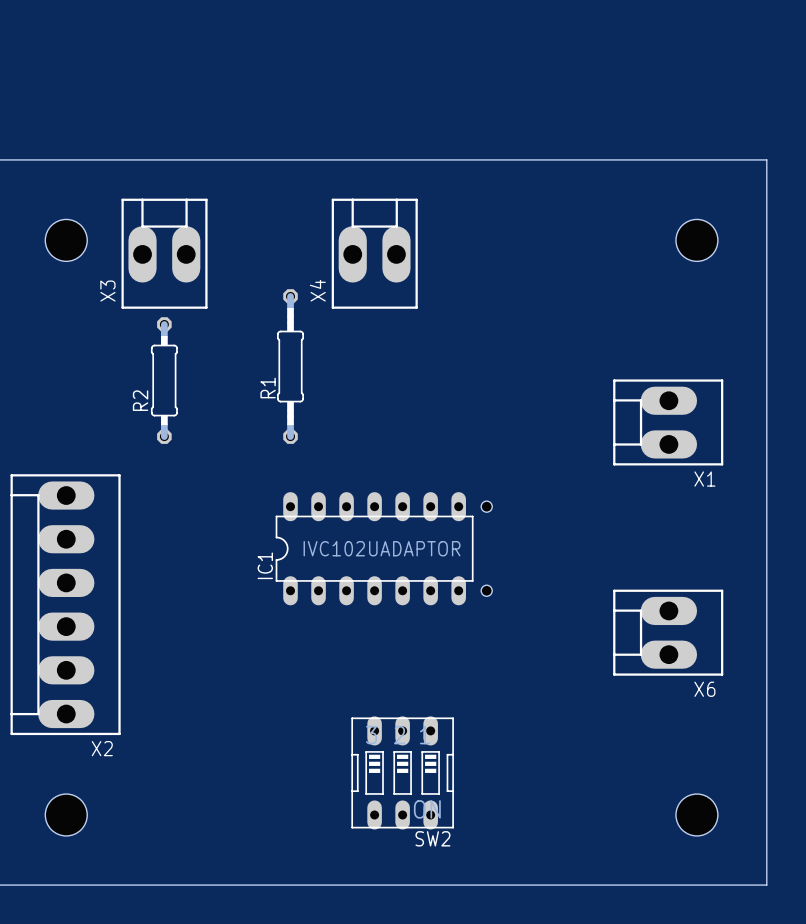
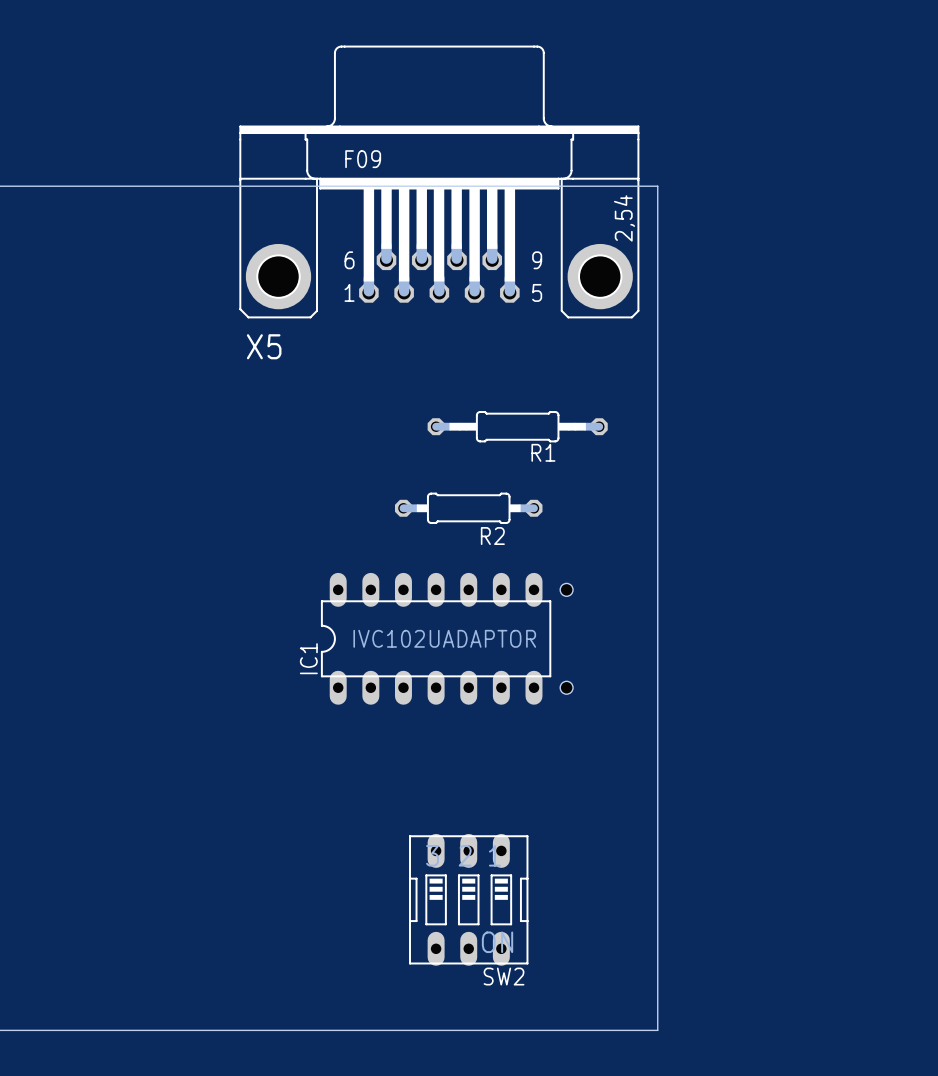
X5: none -> (439, 181)
board edge: (564, 159) (766, 159) (766, 885) (564, 885) -> (657, 186) (657, 1030)
hole: (66, 240) -> none
hole: (696, 240) -> none
X3: (164, 253) -> none
X4: (374, 253) -> none
R1 rotation: 0° (290, 366) -> 90° clockwise (517, 426)
R1 position: (290, 366) -> (517, 426)
R2 rotation: 0° (164, 380) -> 90° clockwise (468, 508)
R2 position: (164, 380) -> (468, 508)
R1 name position: R1 (268, 388) -> R1 (543, 452)
R2 name position: R2 (140, 400) -> R2 (492, 536)
X1: (668, 422) -> none
X2: (65, 604) -> none
X6: (668, 632) -> none
hole: (66, 814) -> none
hole: (696, 814) -> none

